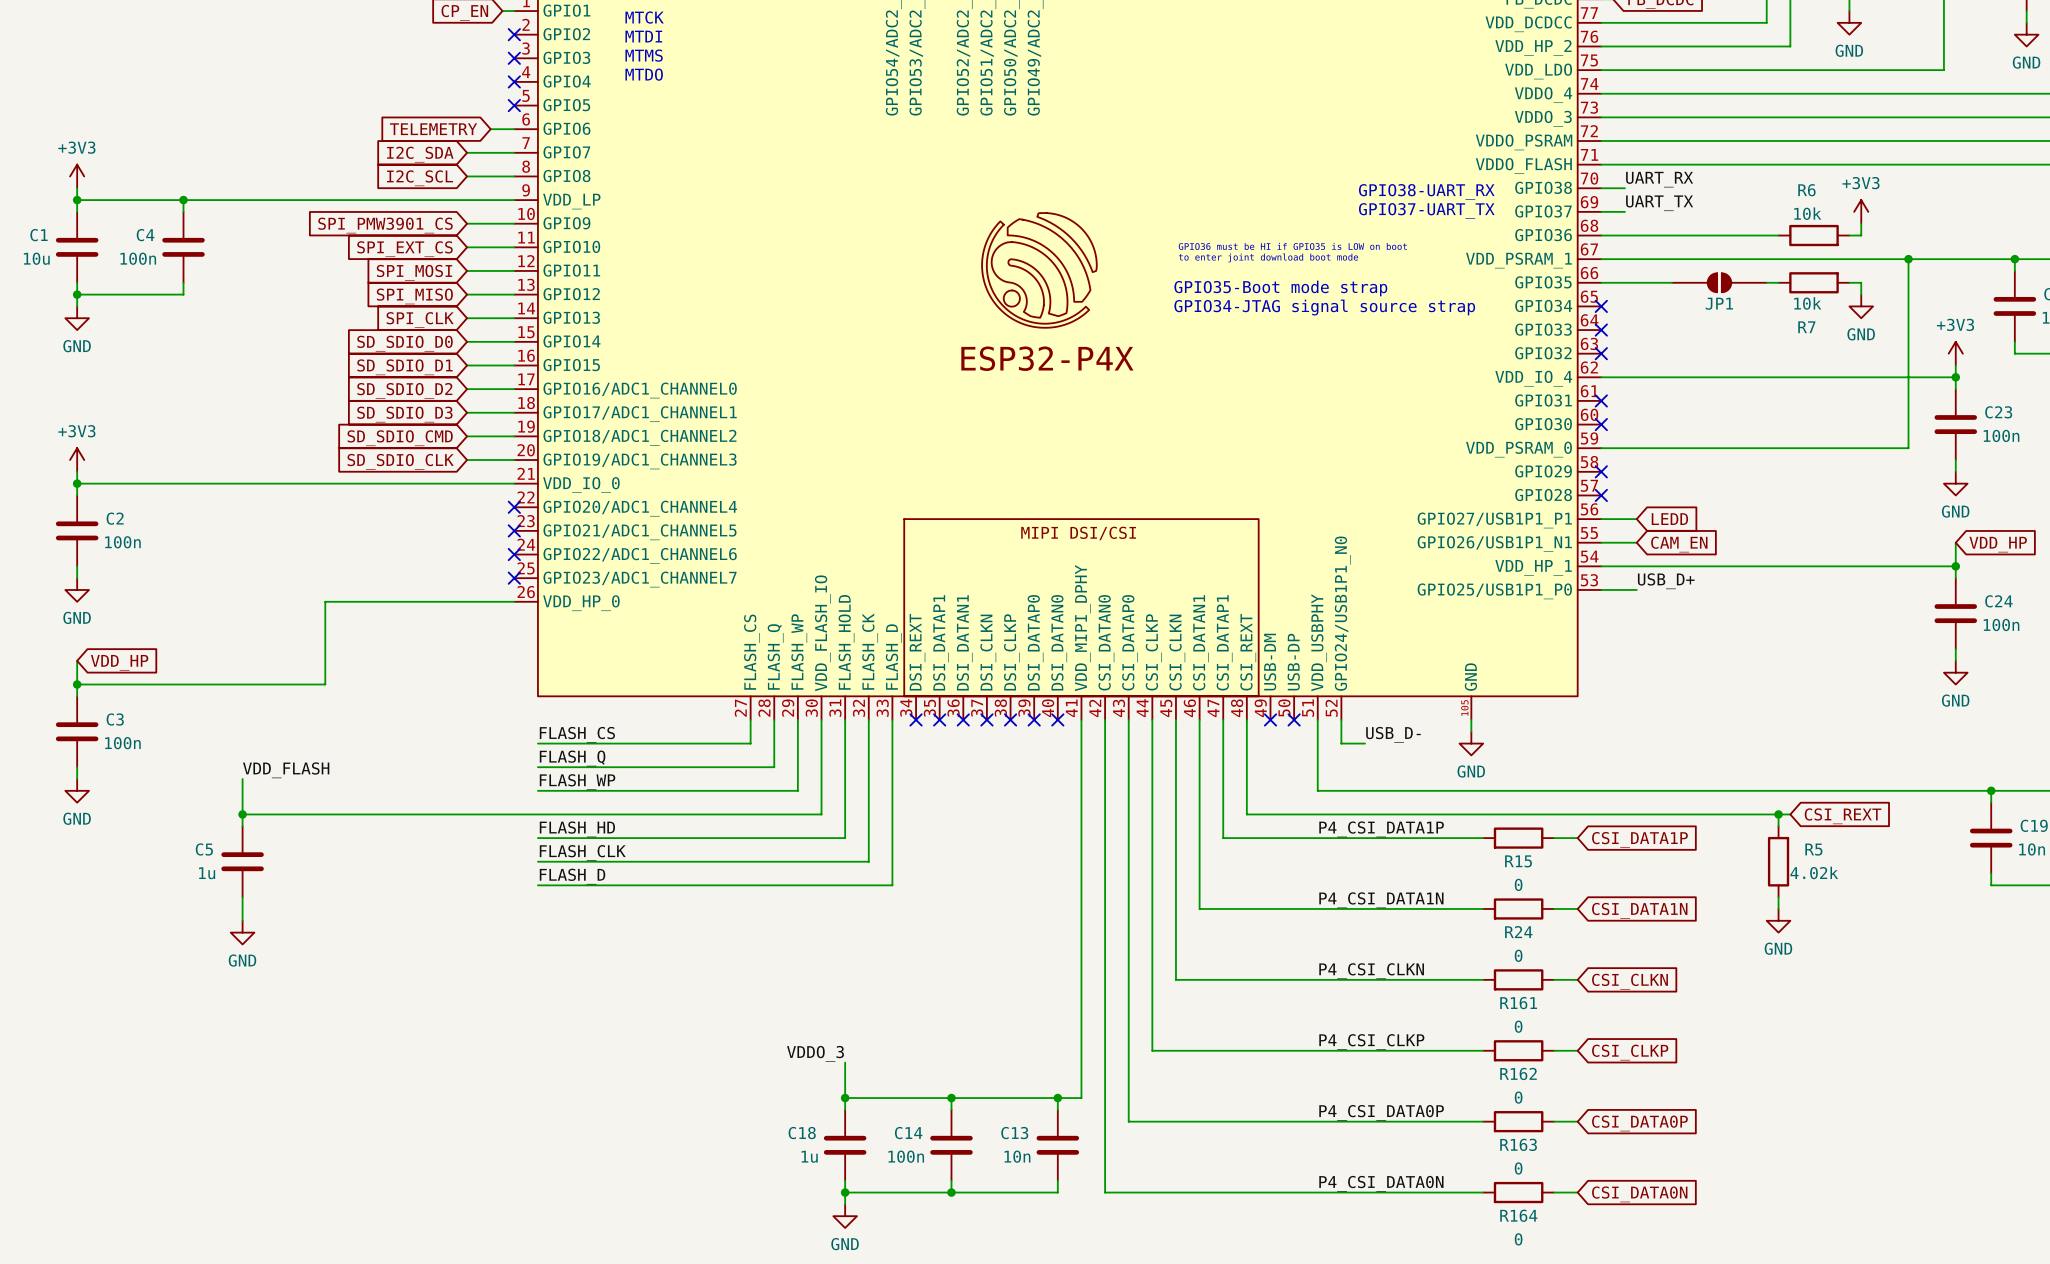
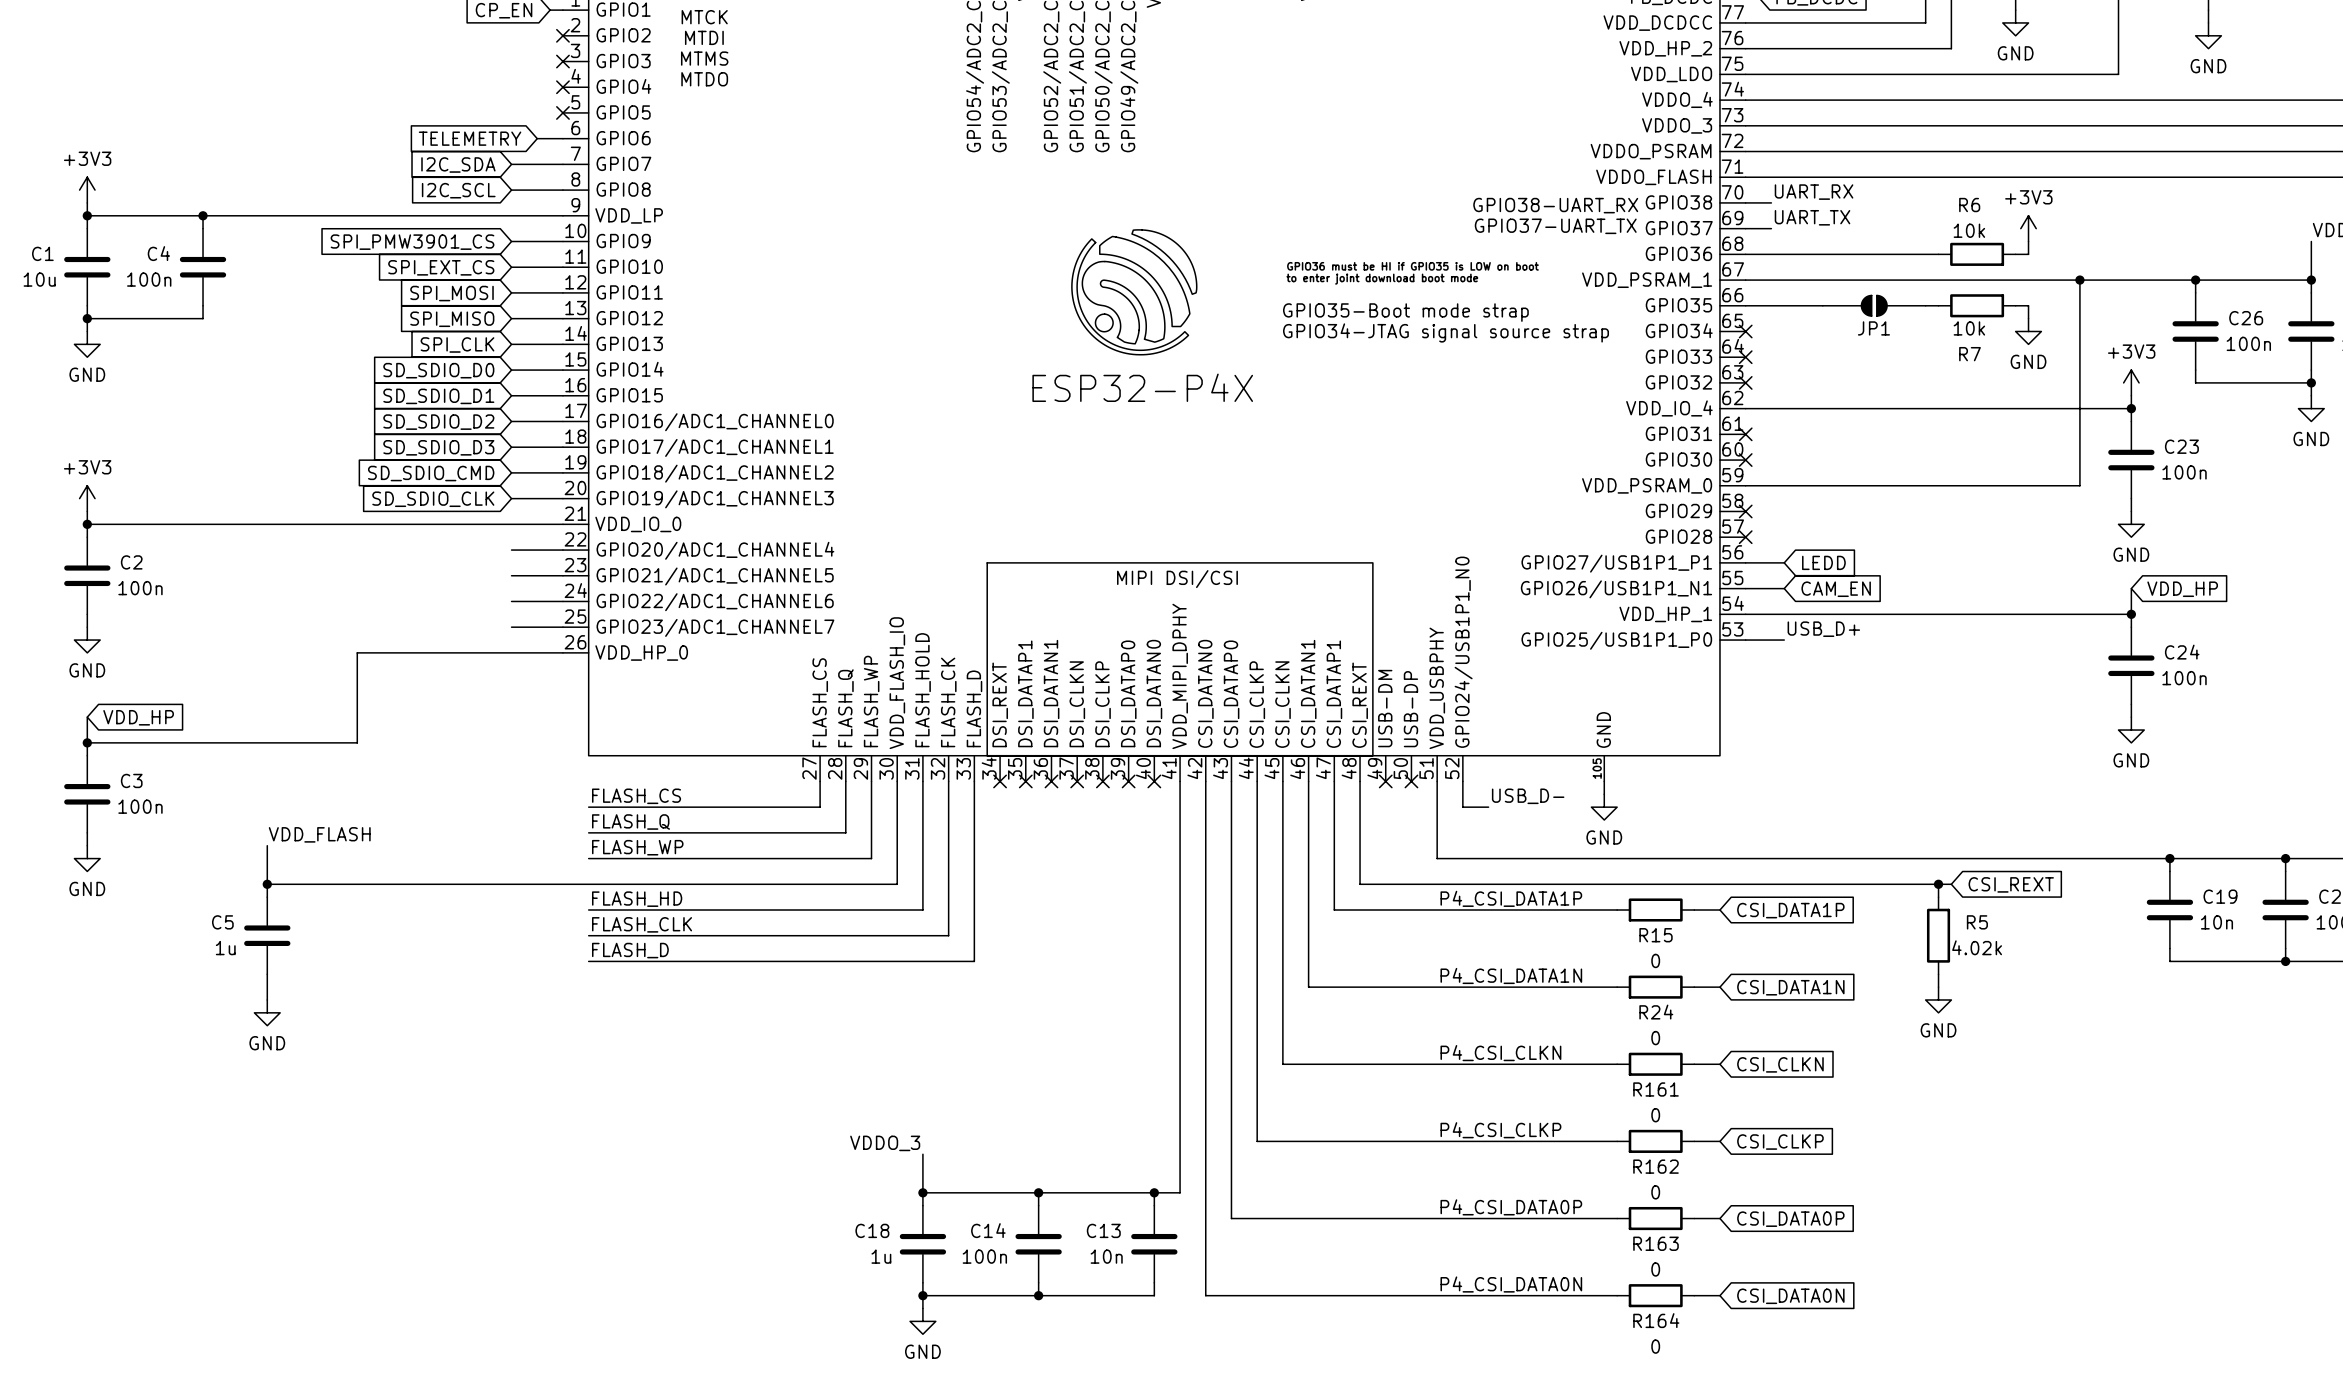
wire: none -> (511, 550) (562, 550)
no-connect mark: (514, 507) -> none
wire: none -> (511, 575) (562, 575)
no-connect mark: (514, 530) -> none
wire: none -> (511, 601) (562, 601)
no-connect mark: (514, 554) -> none
wire: none -> (511, 627) (562, 627)
no-connect mark: (514, 578) -> none

